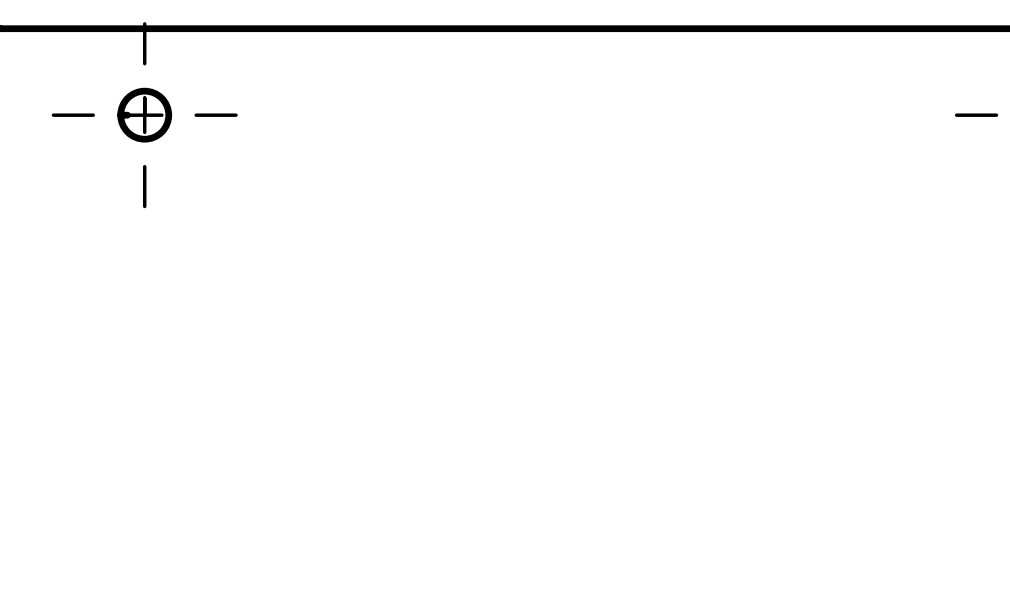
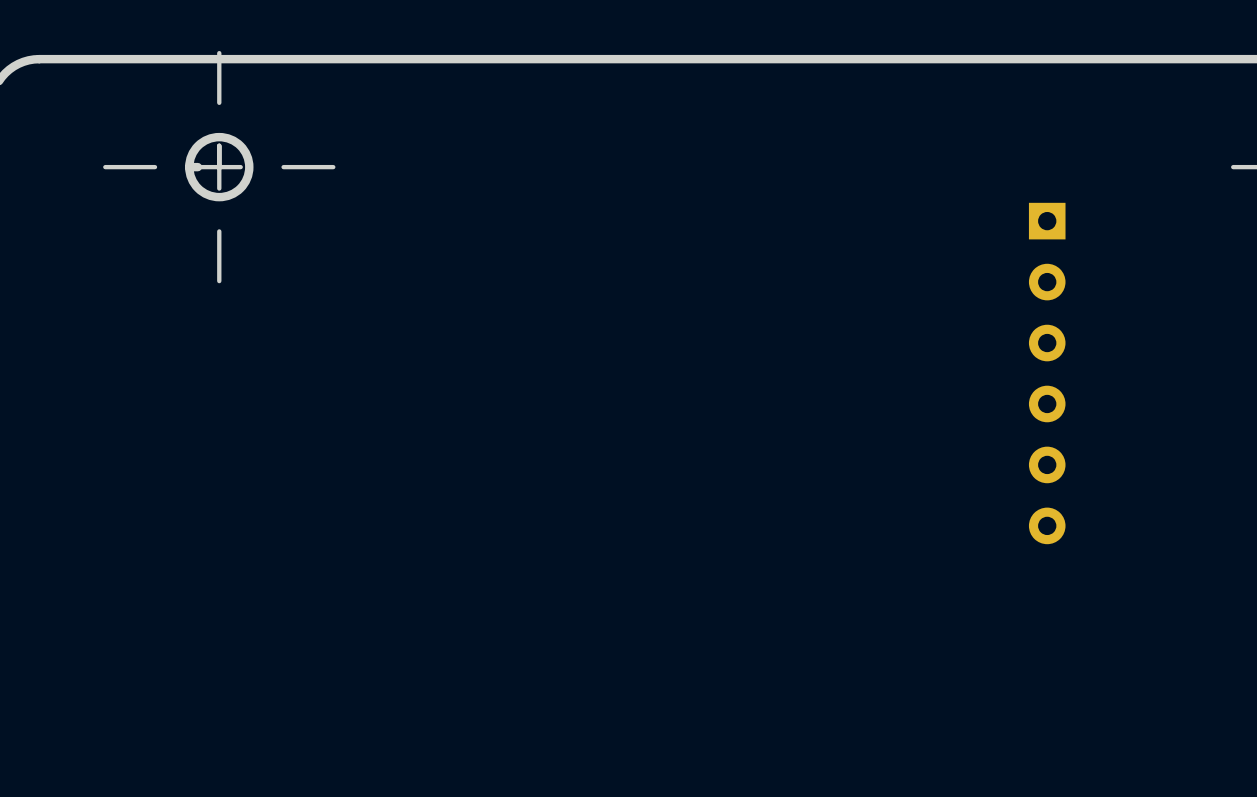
part: none -> (1047, 373)

